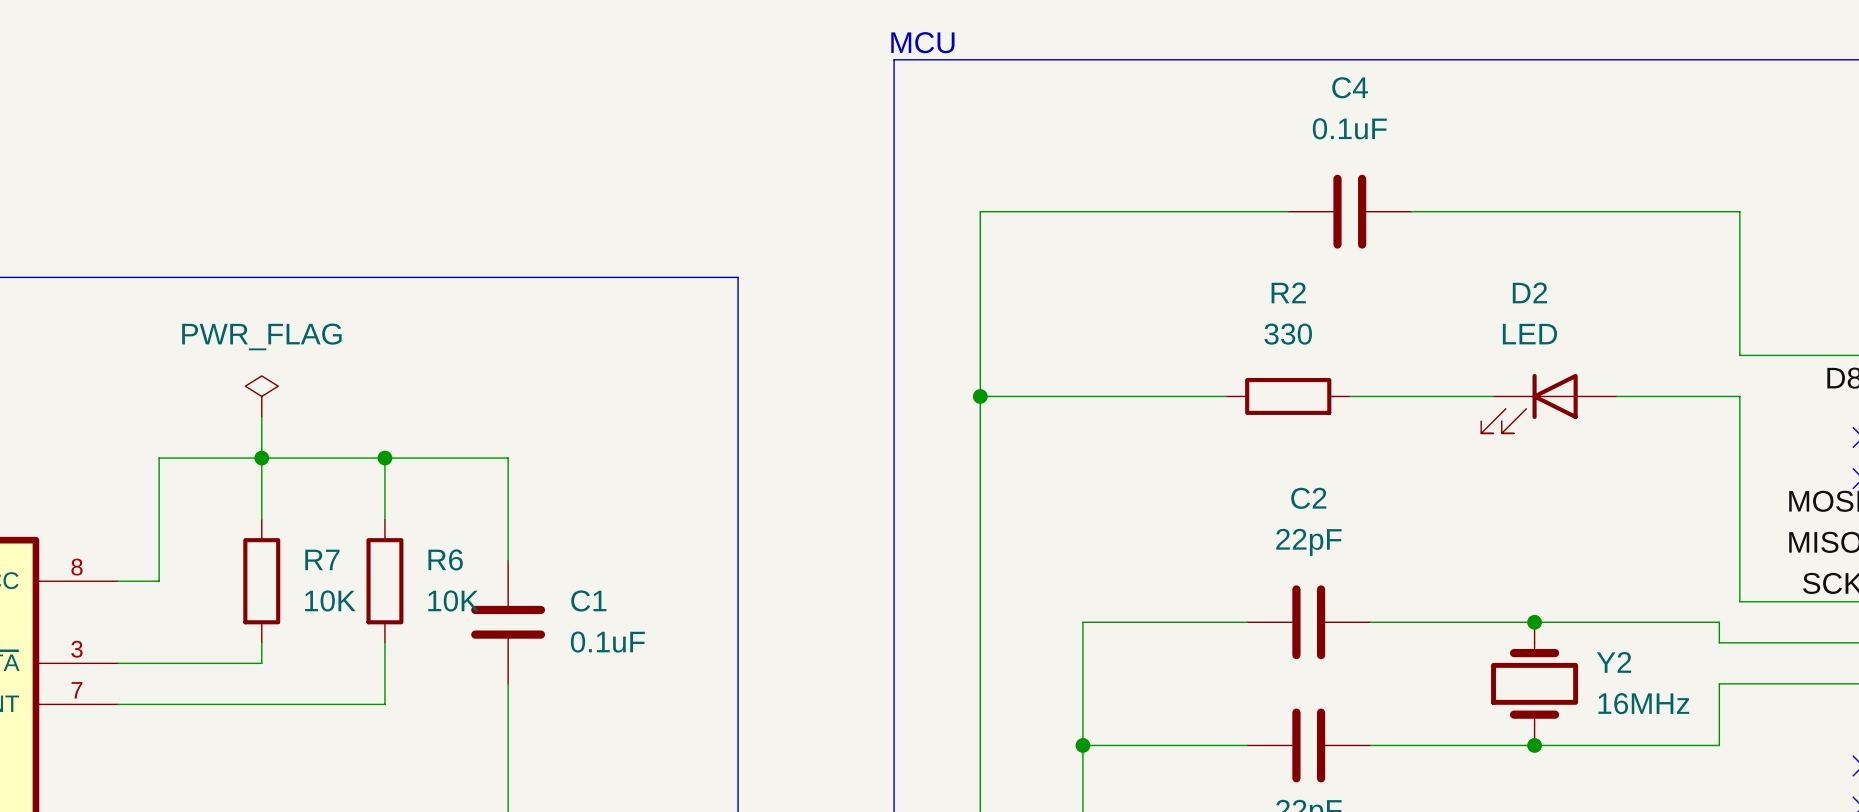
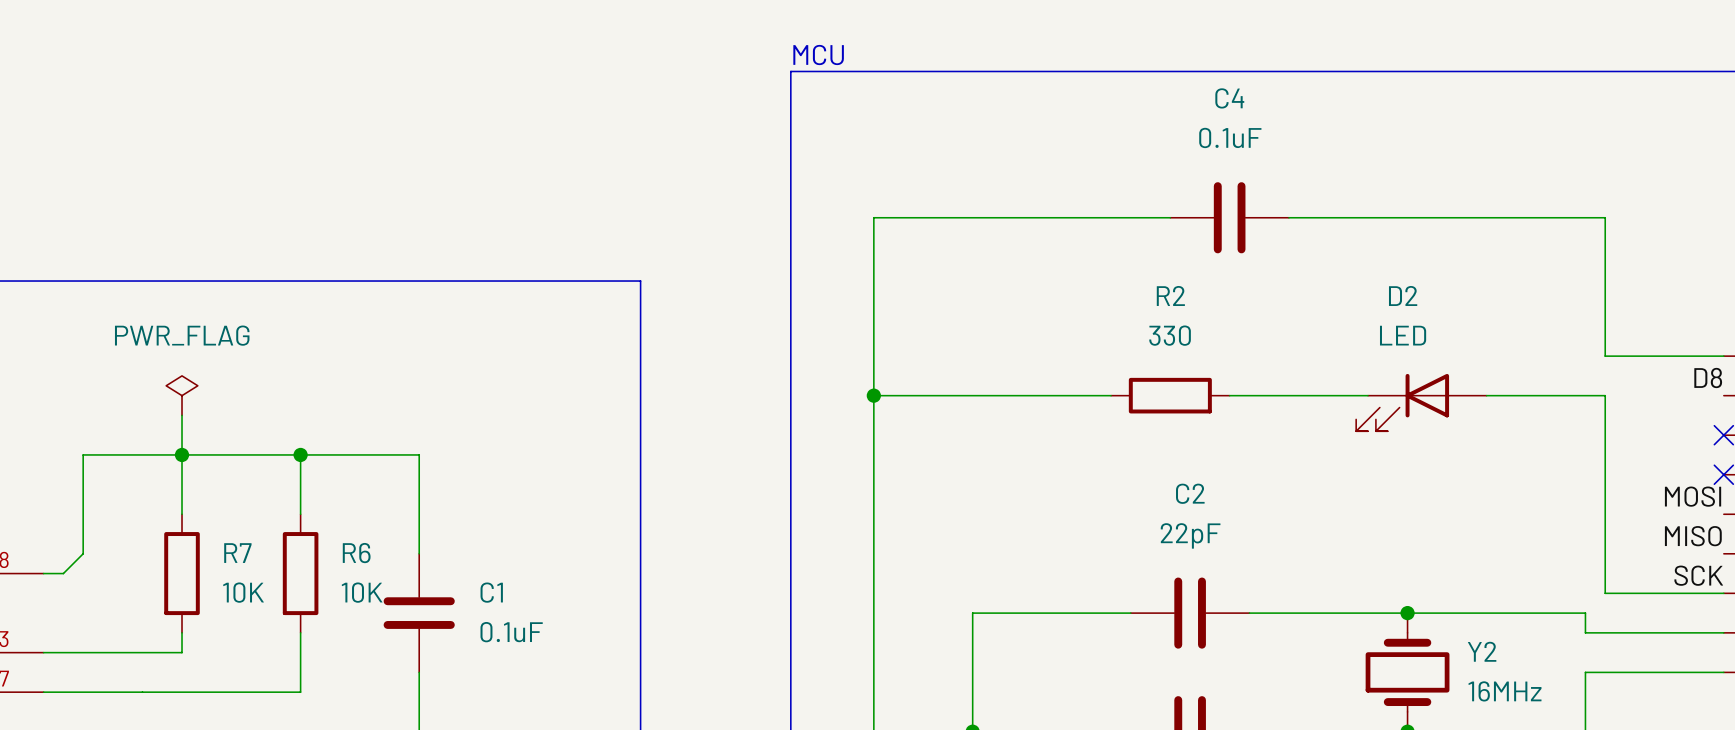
wire: (159, 560) (159, 581) (138, 581) -> (83, 553) (63, 573)

